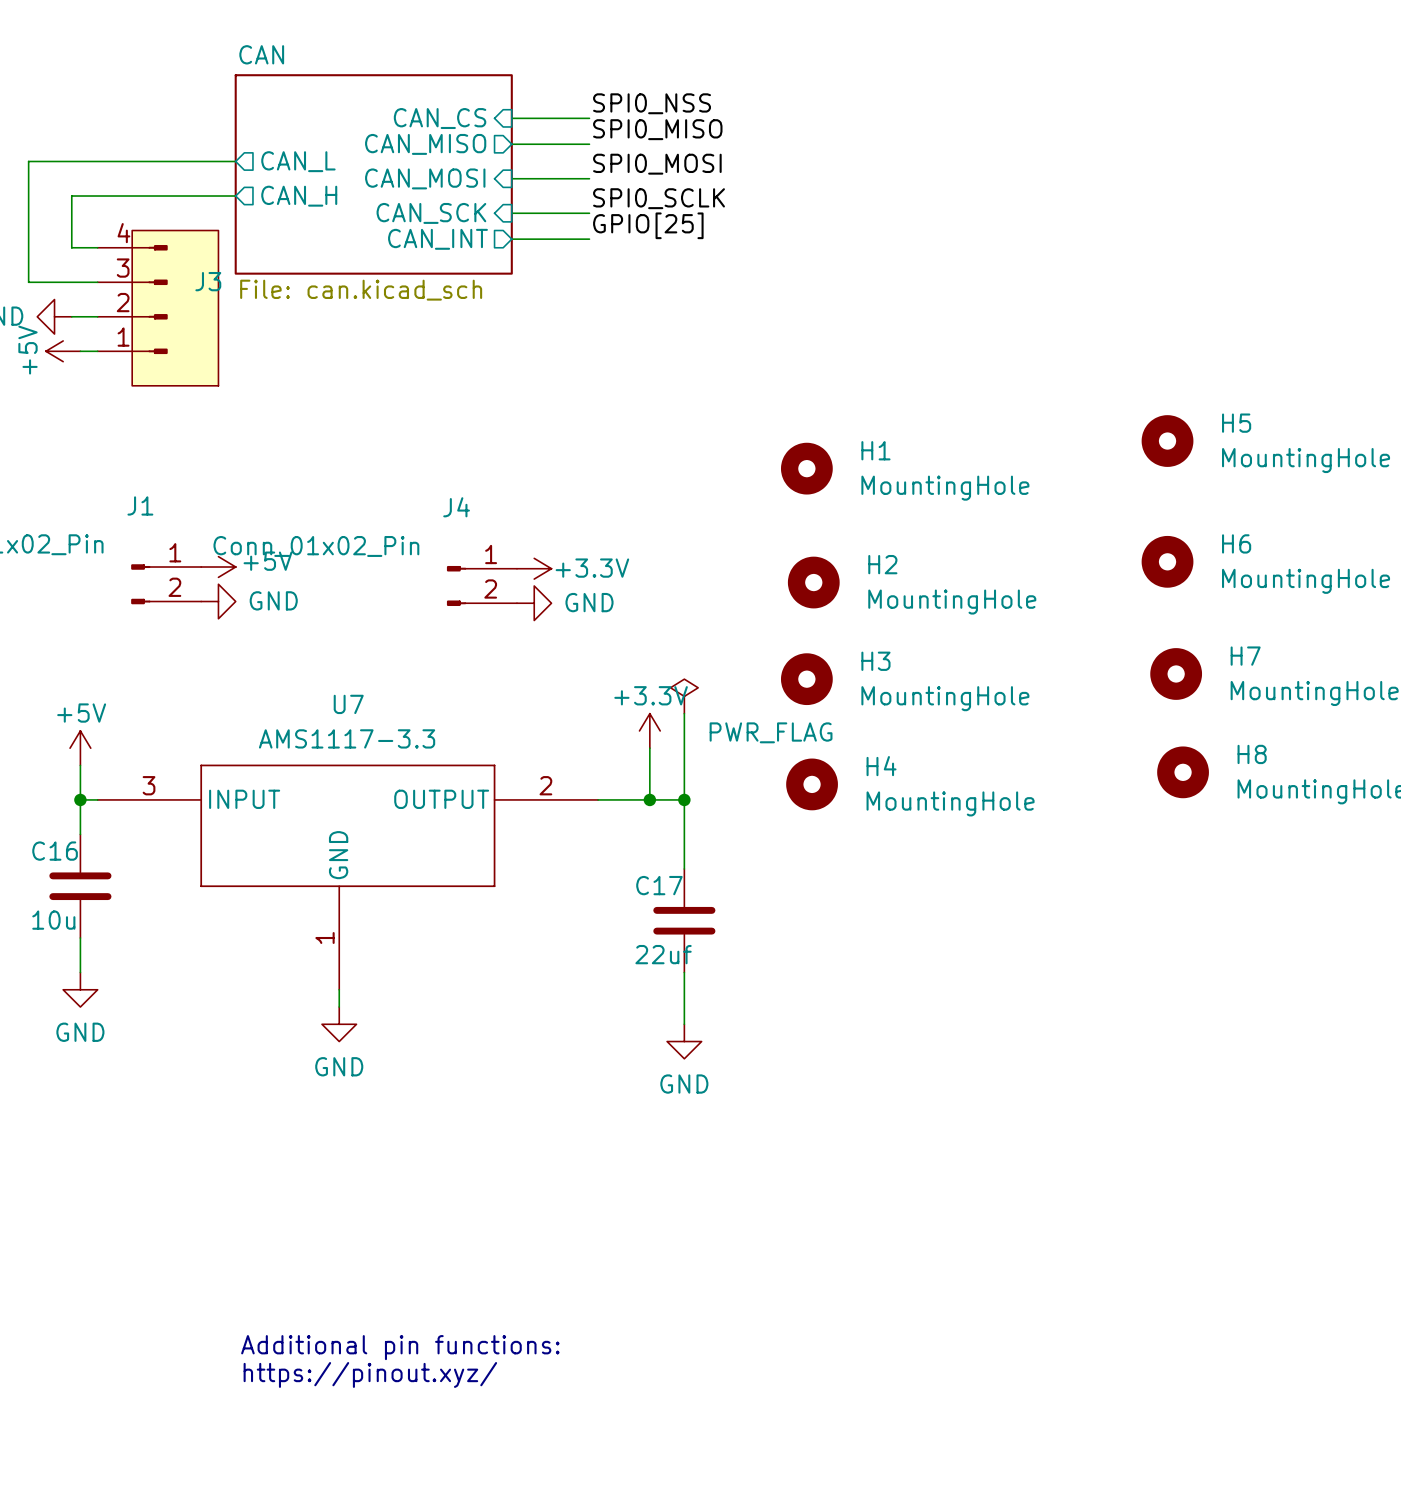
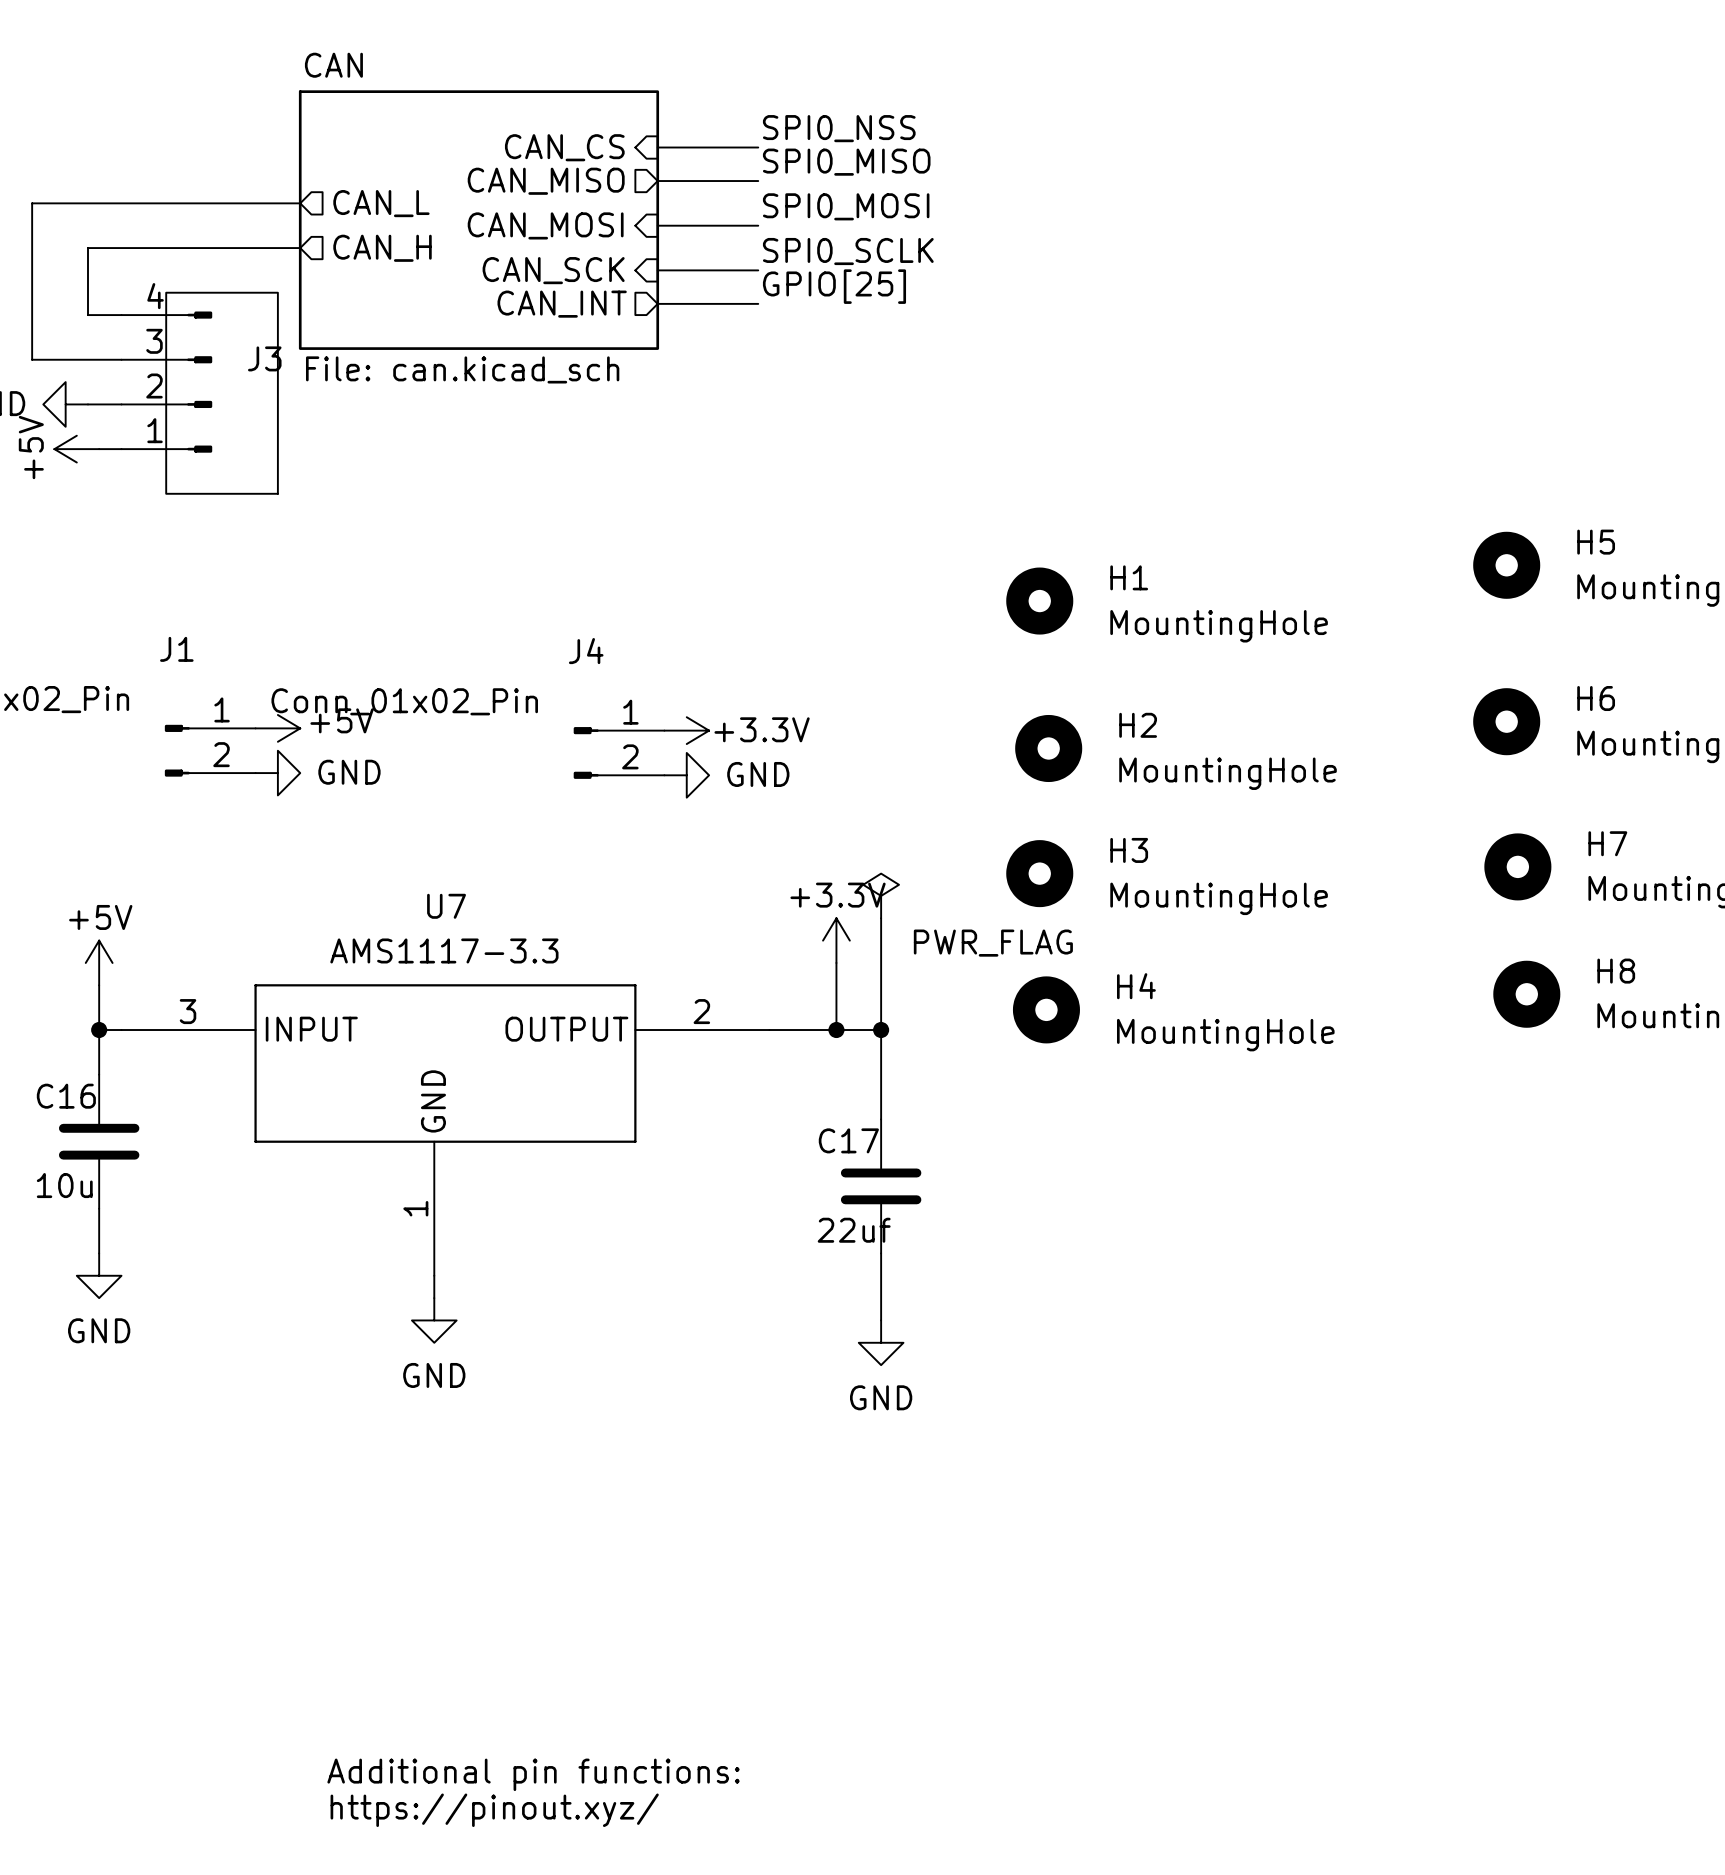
text position: Additional pin functions: (400, 1347) -> Additional pin functions: (533, 1774)
text position: https://pinout.xyz/ (370, 1374) -> https://pinout.xyz/ (494, 1810)

